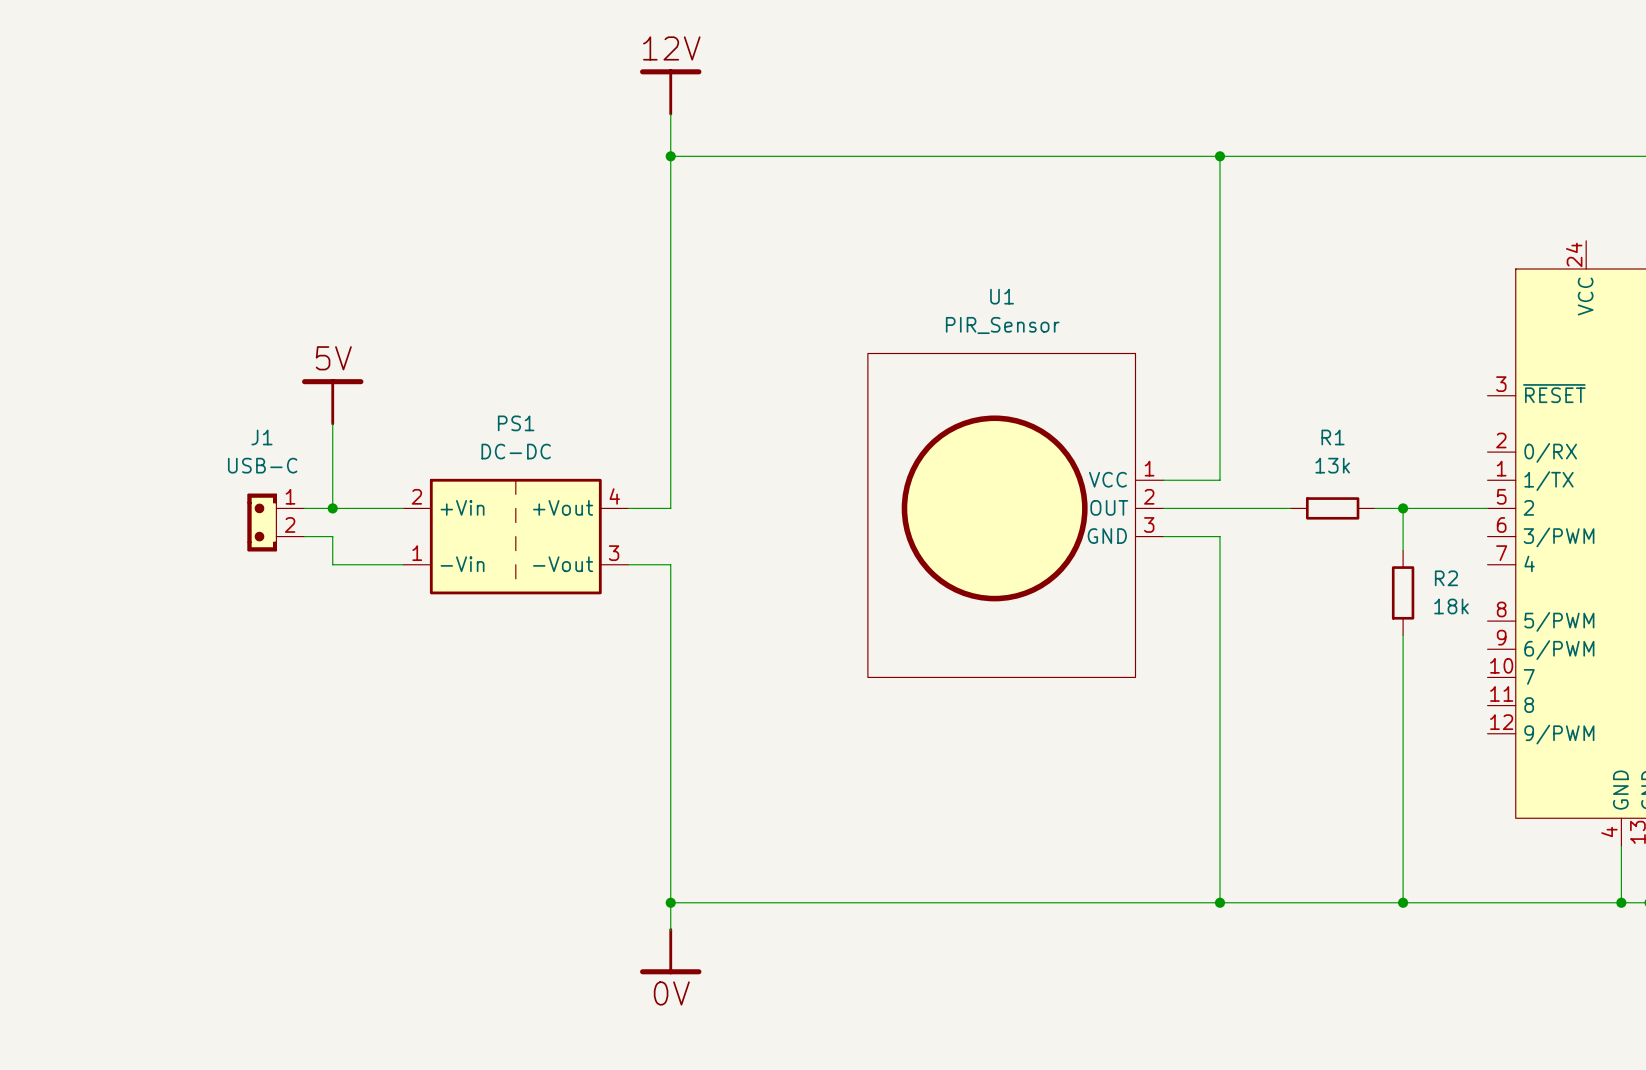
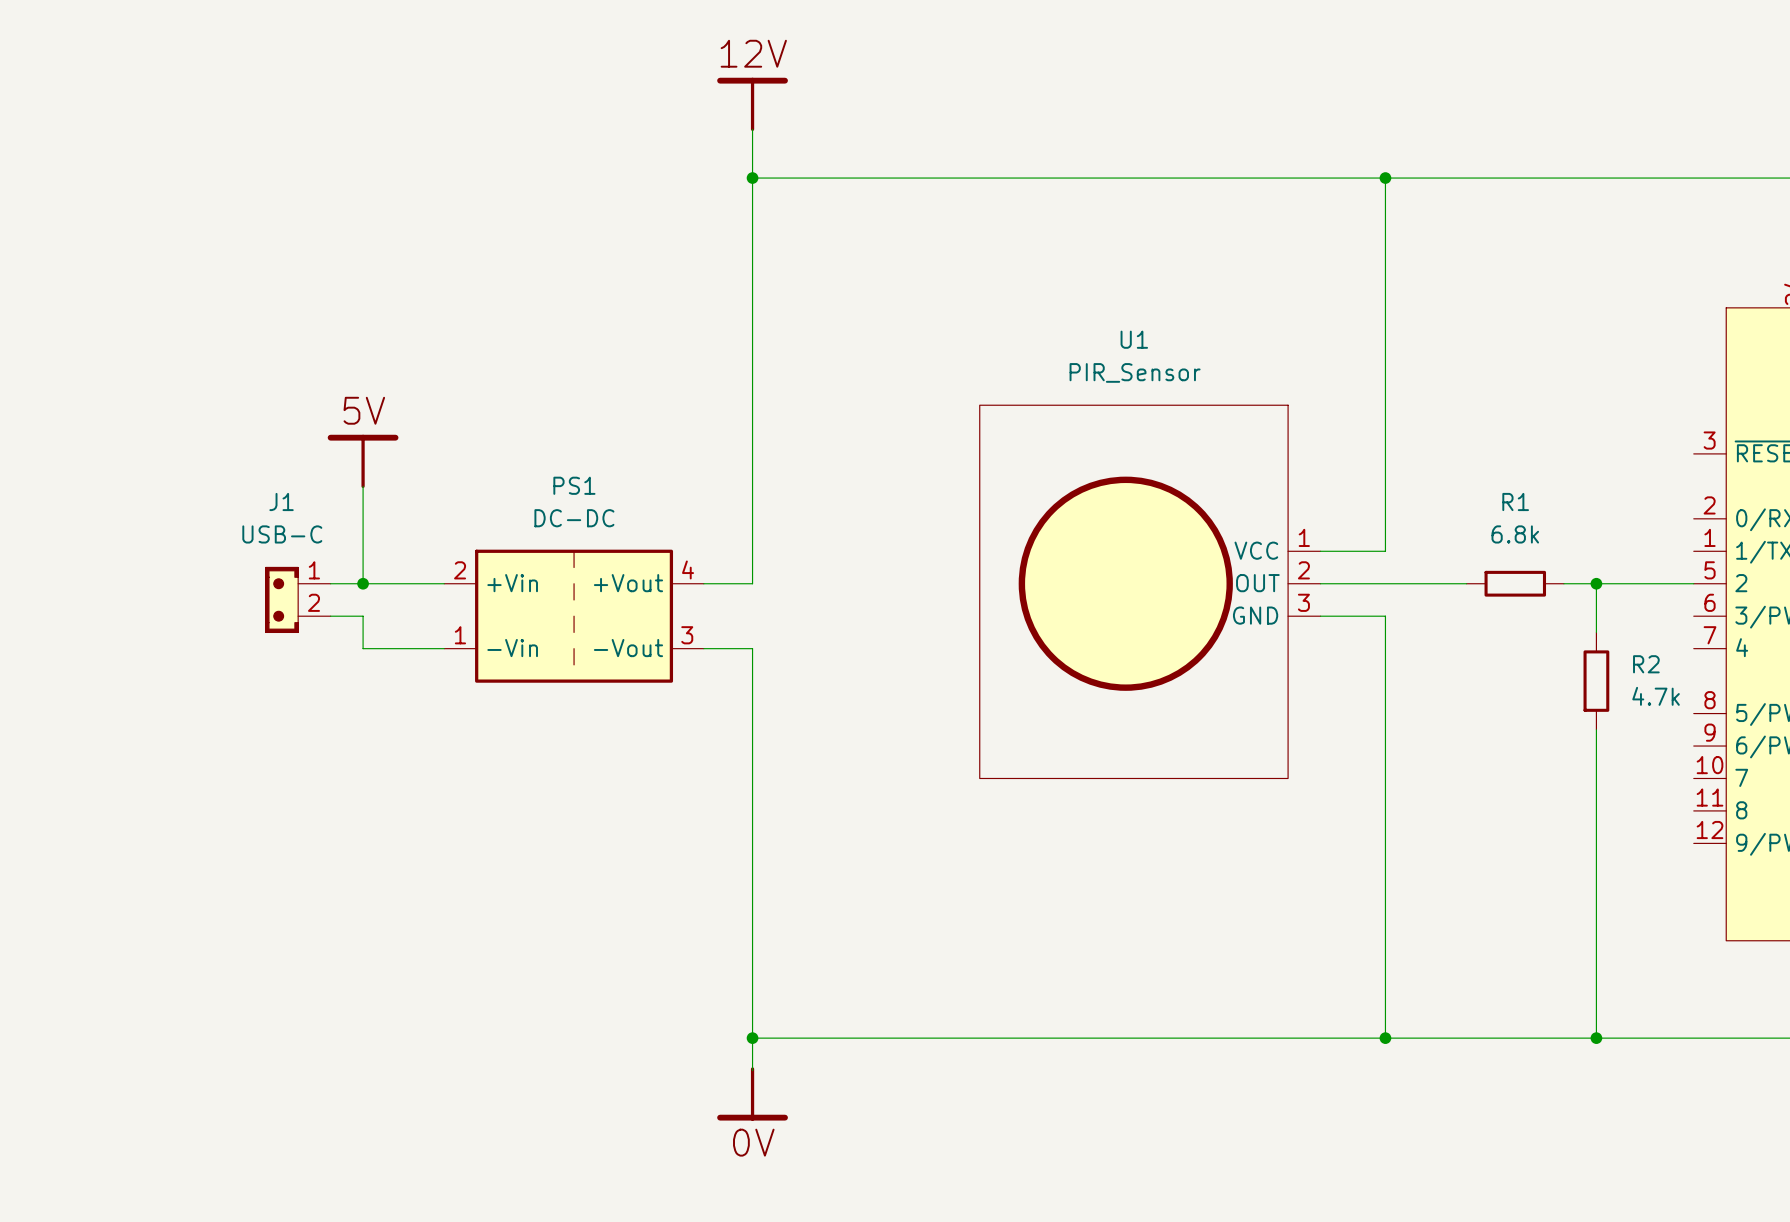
R1 value: 13k (1332, 465) -> 6.8k (1515, 534)
R2 value: 18k (1451, 606) -> 4.7k (1656, 696)

